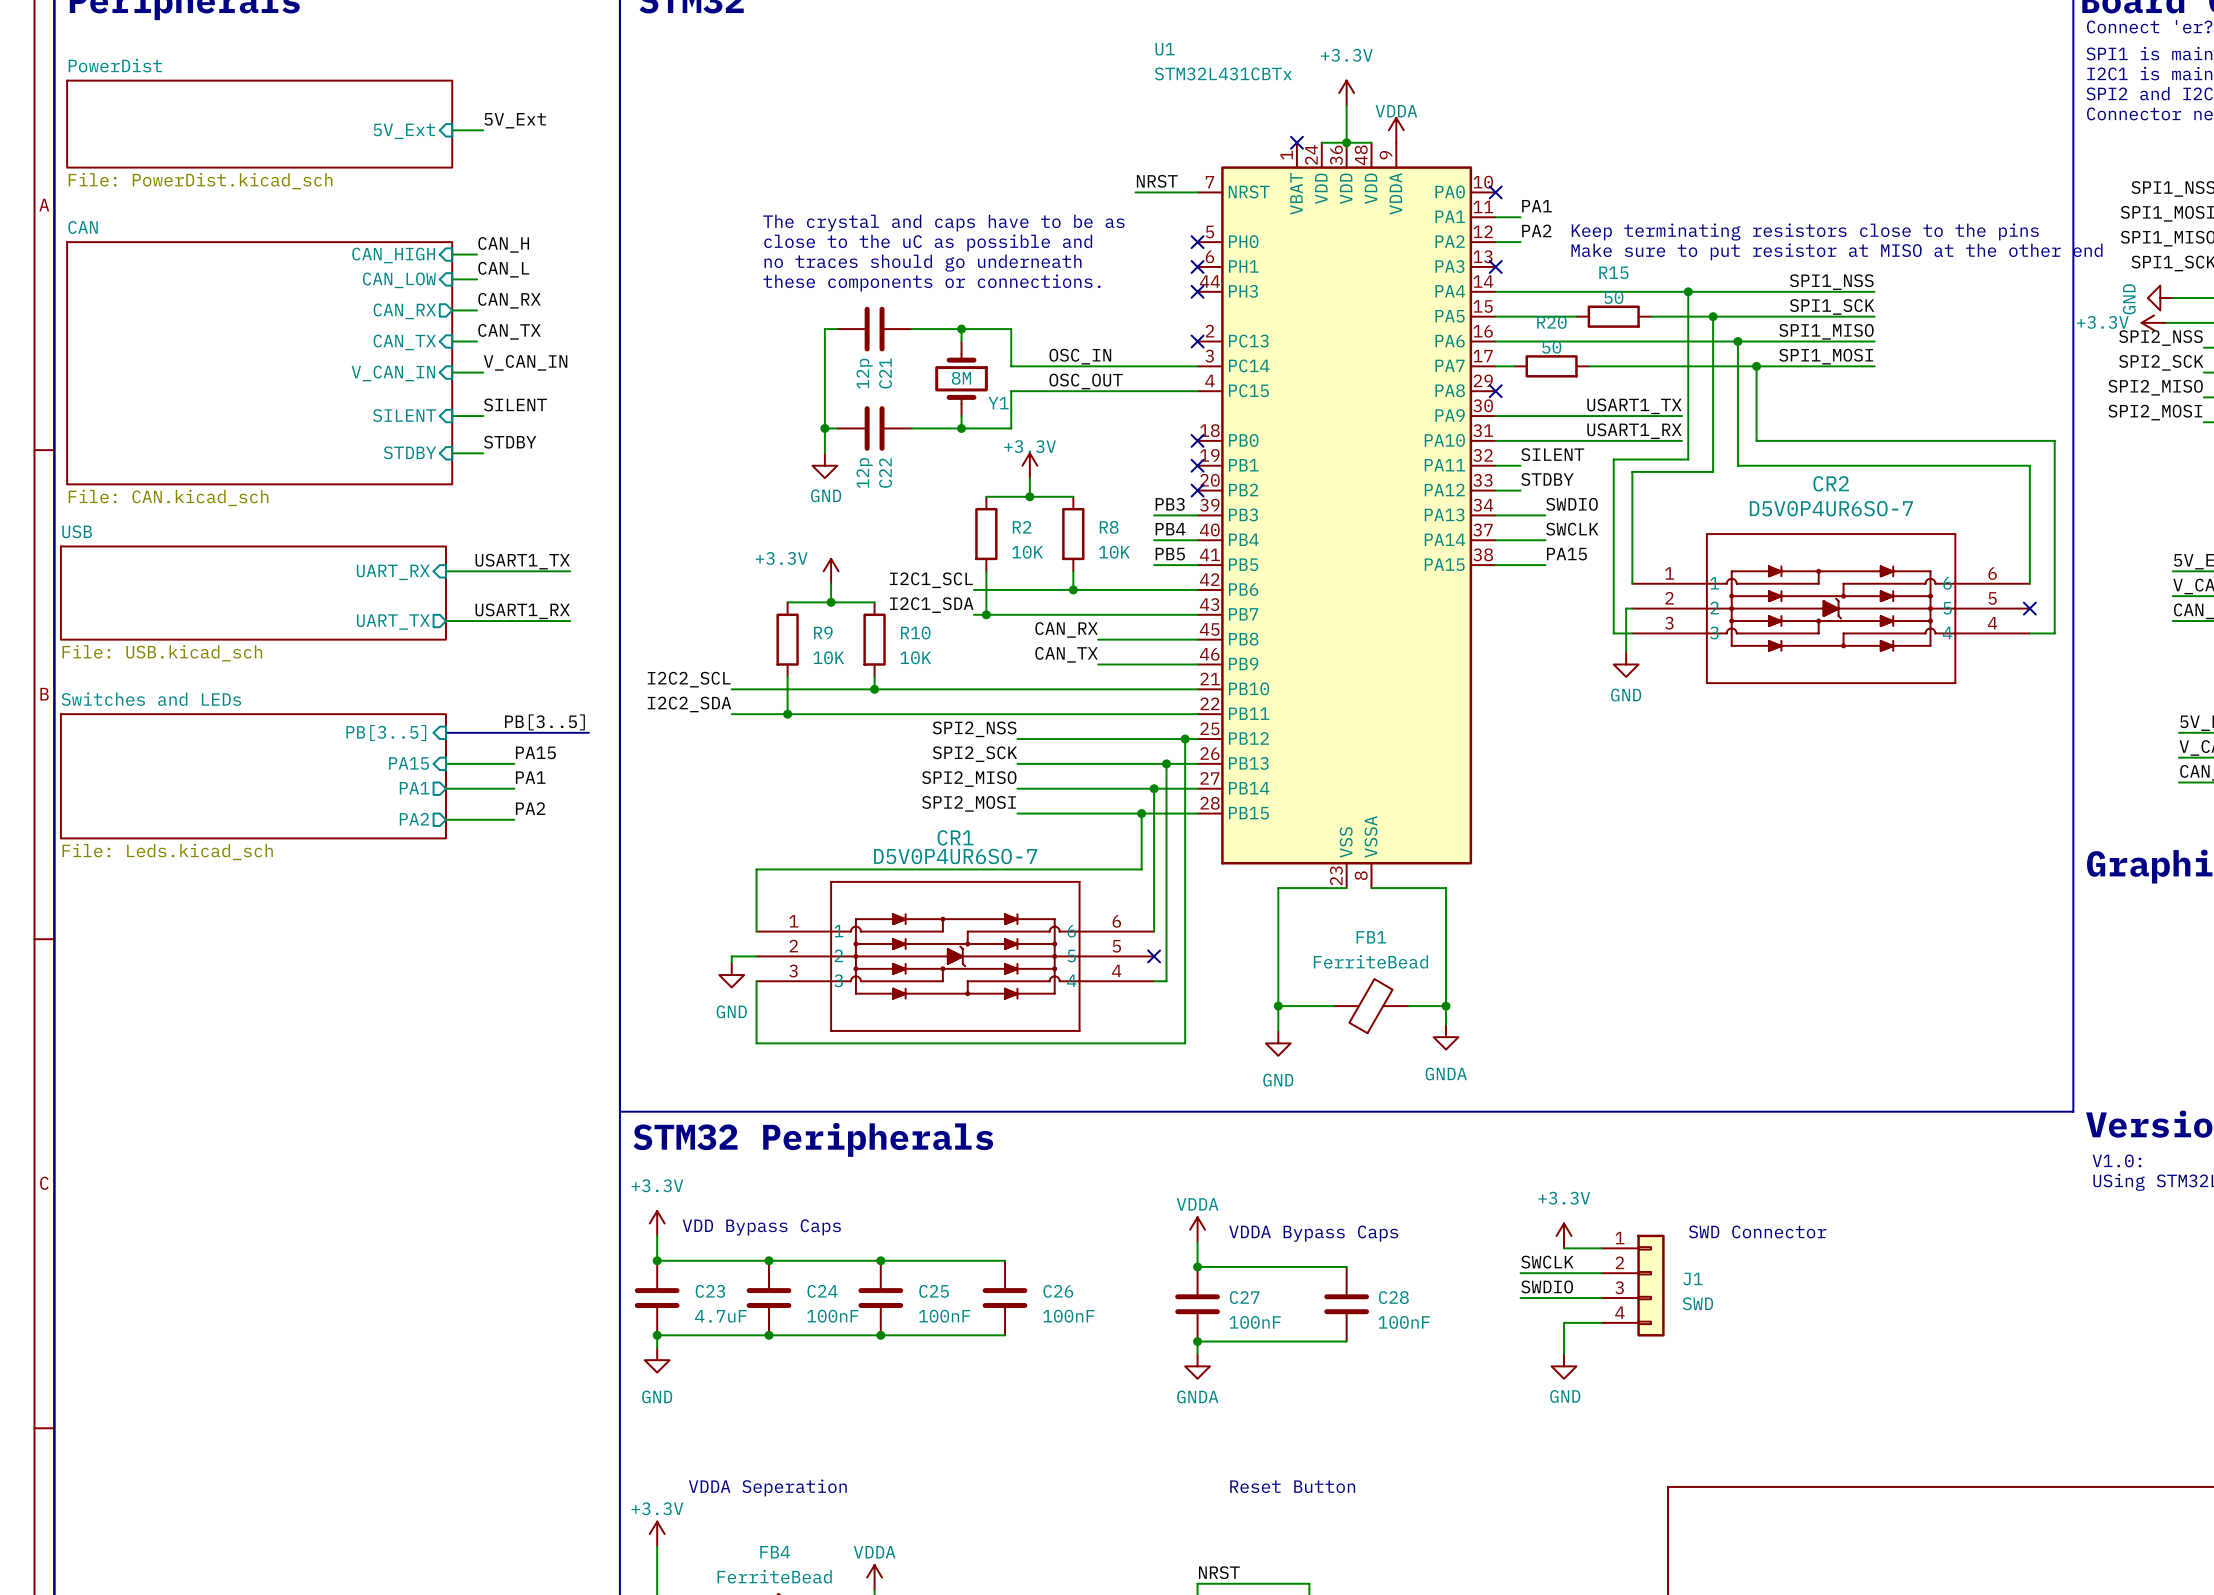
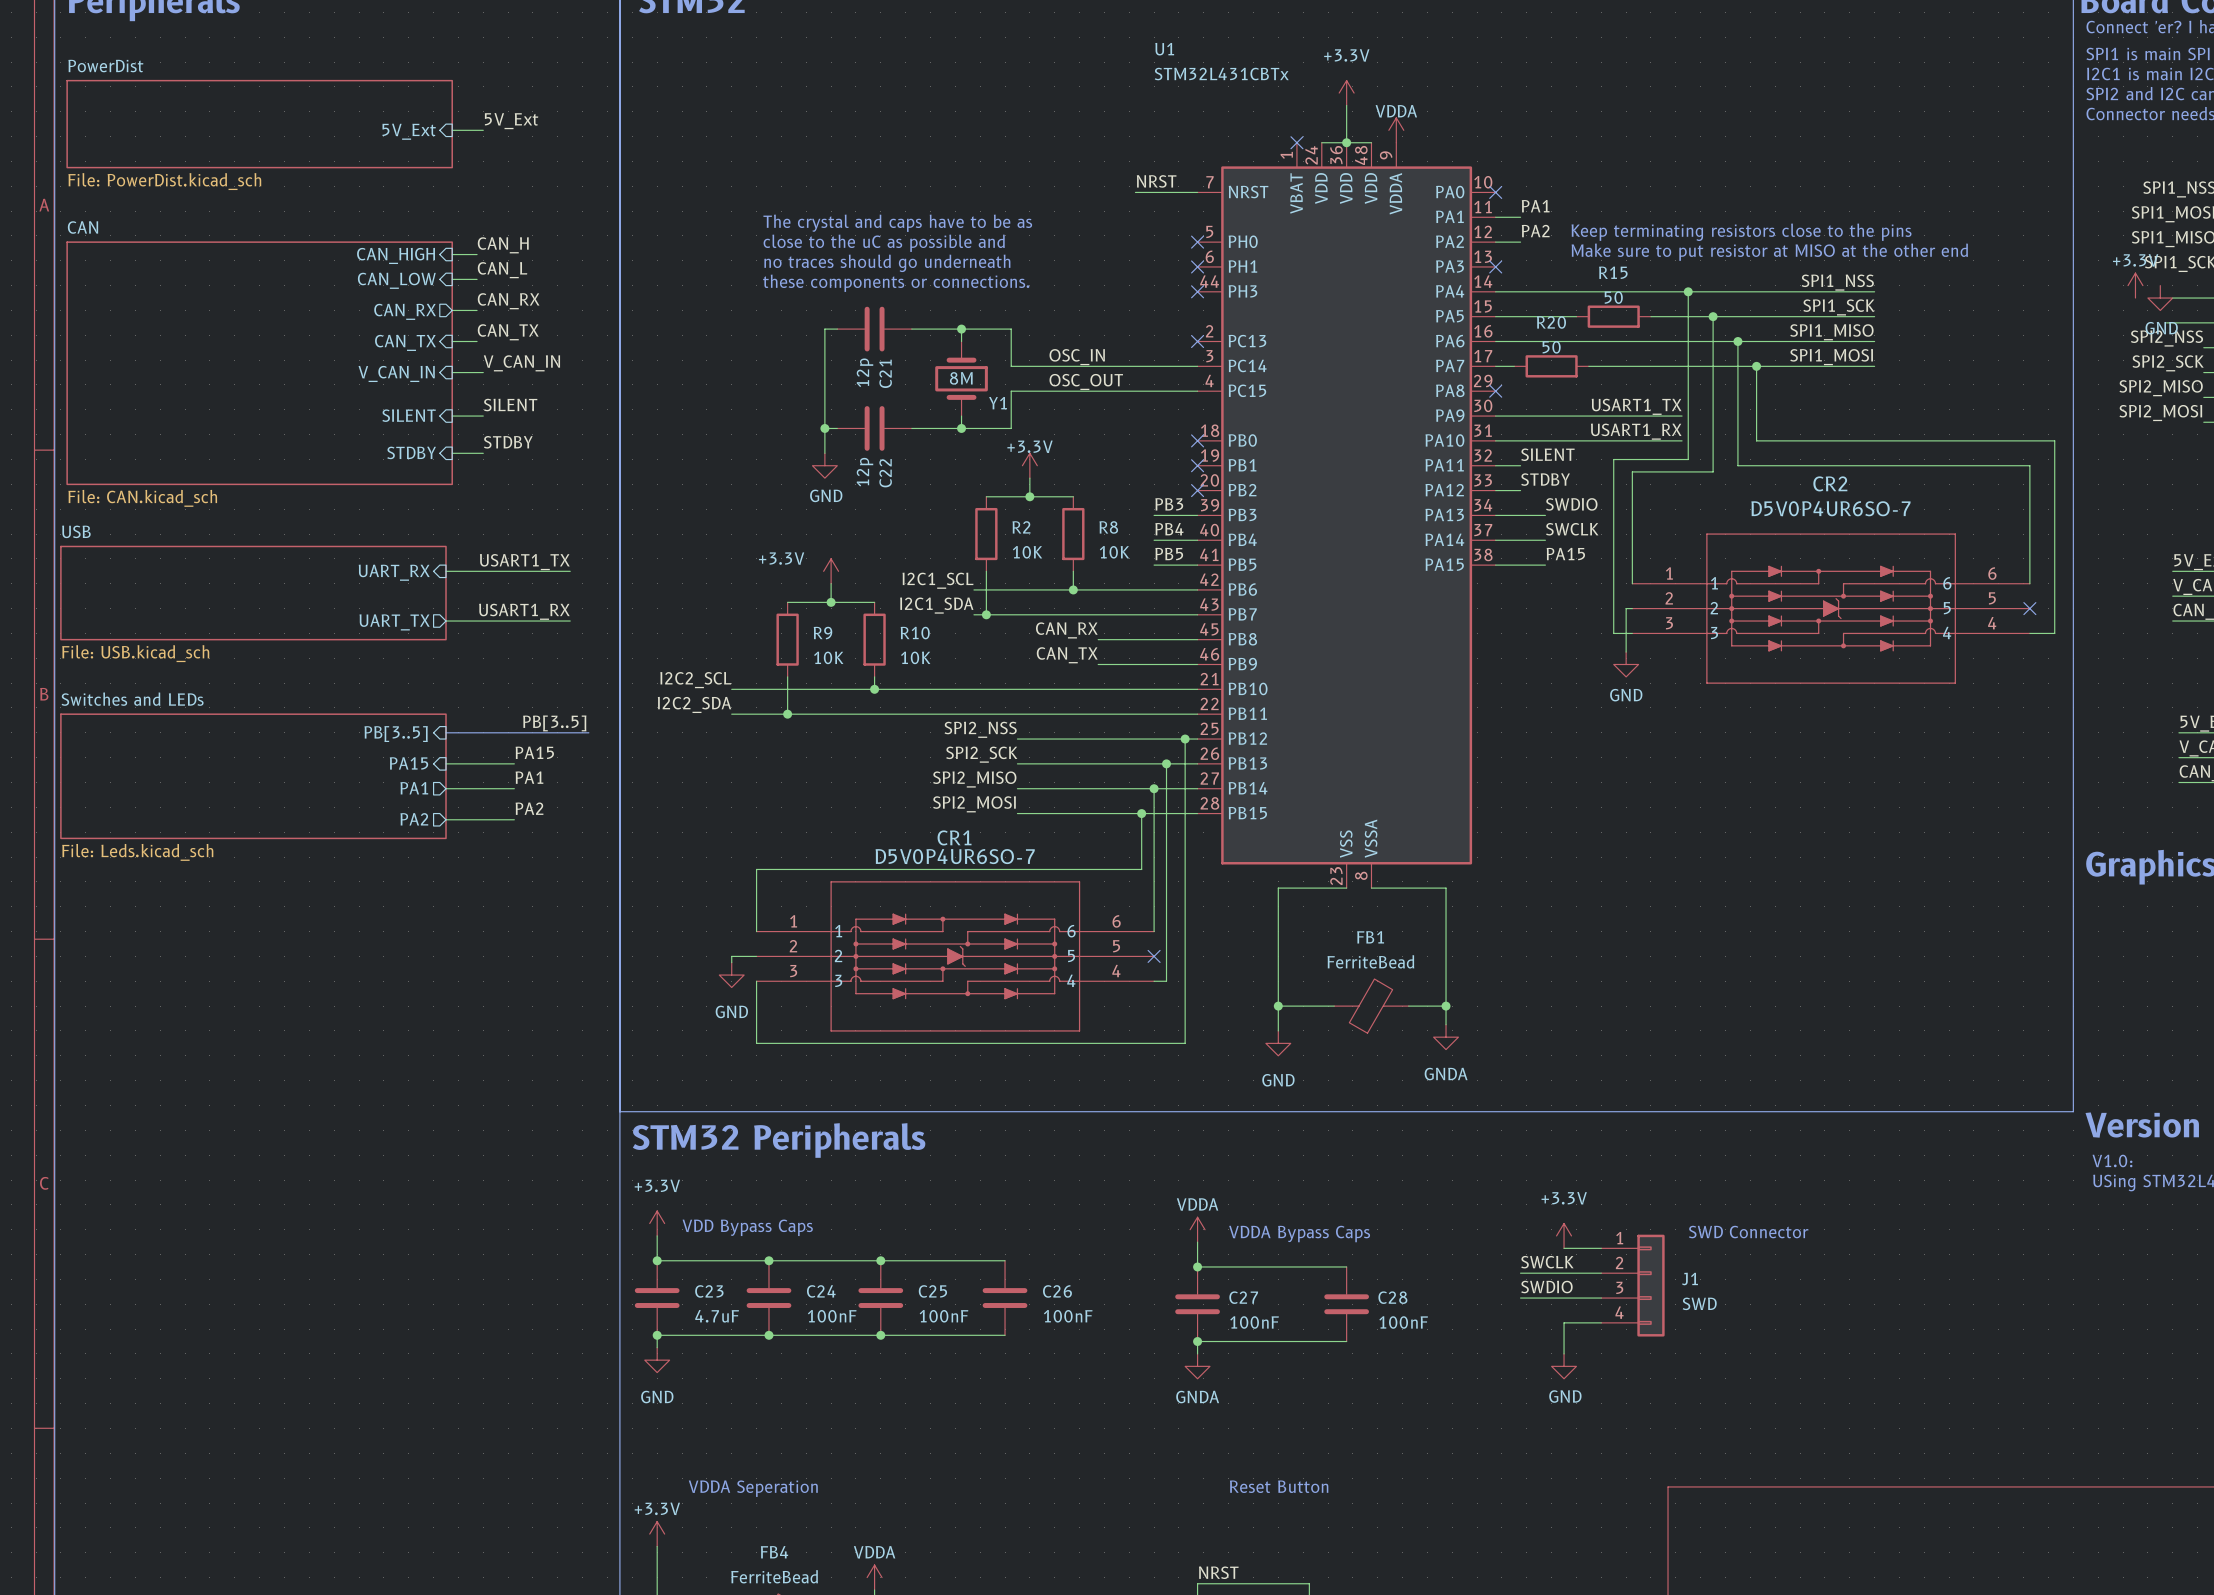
power symbol rotation: 0° (2160, 298) -> 90° counterclockwise (2160, 298)
power symbol text position: +3.3V (2102, 322) -> +3.3V (2135, 260)
power symbol rotation: 0° (2154, 322) -> 90° clockwise (2135, 285)
power symbol position: +3.3V (2154, 322) -> +3.3V (2135, 285)

